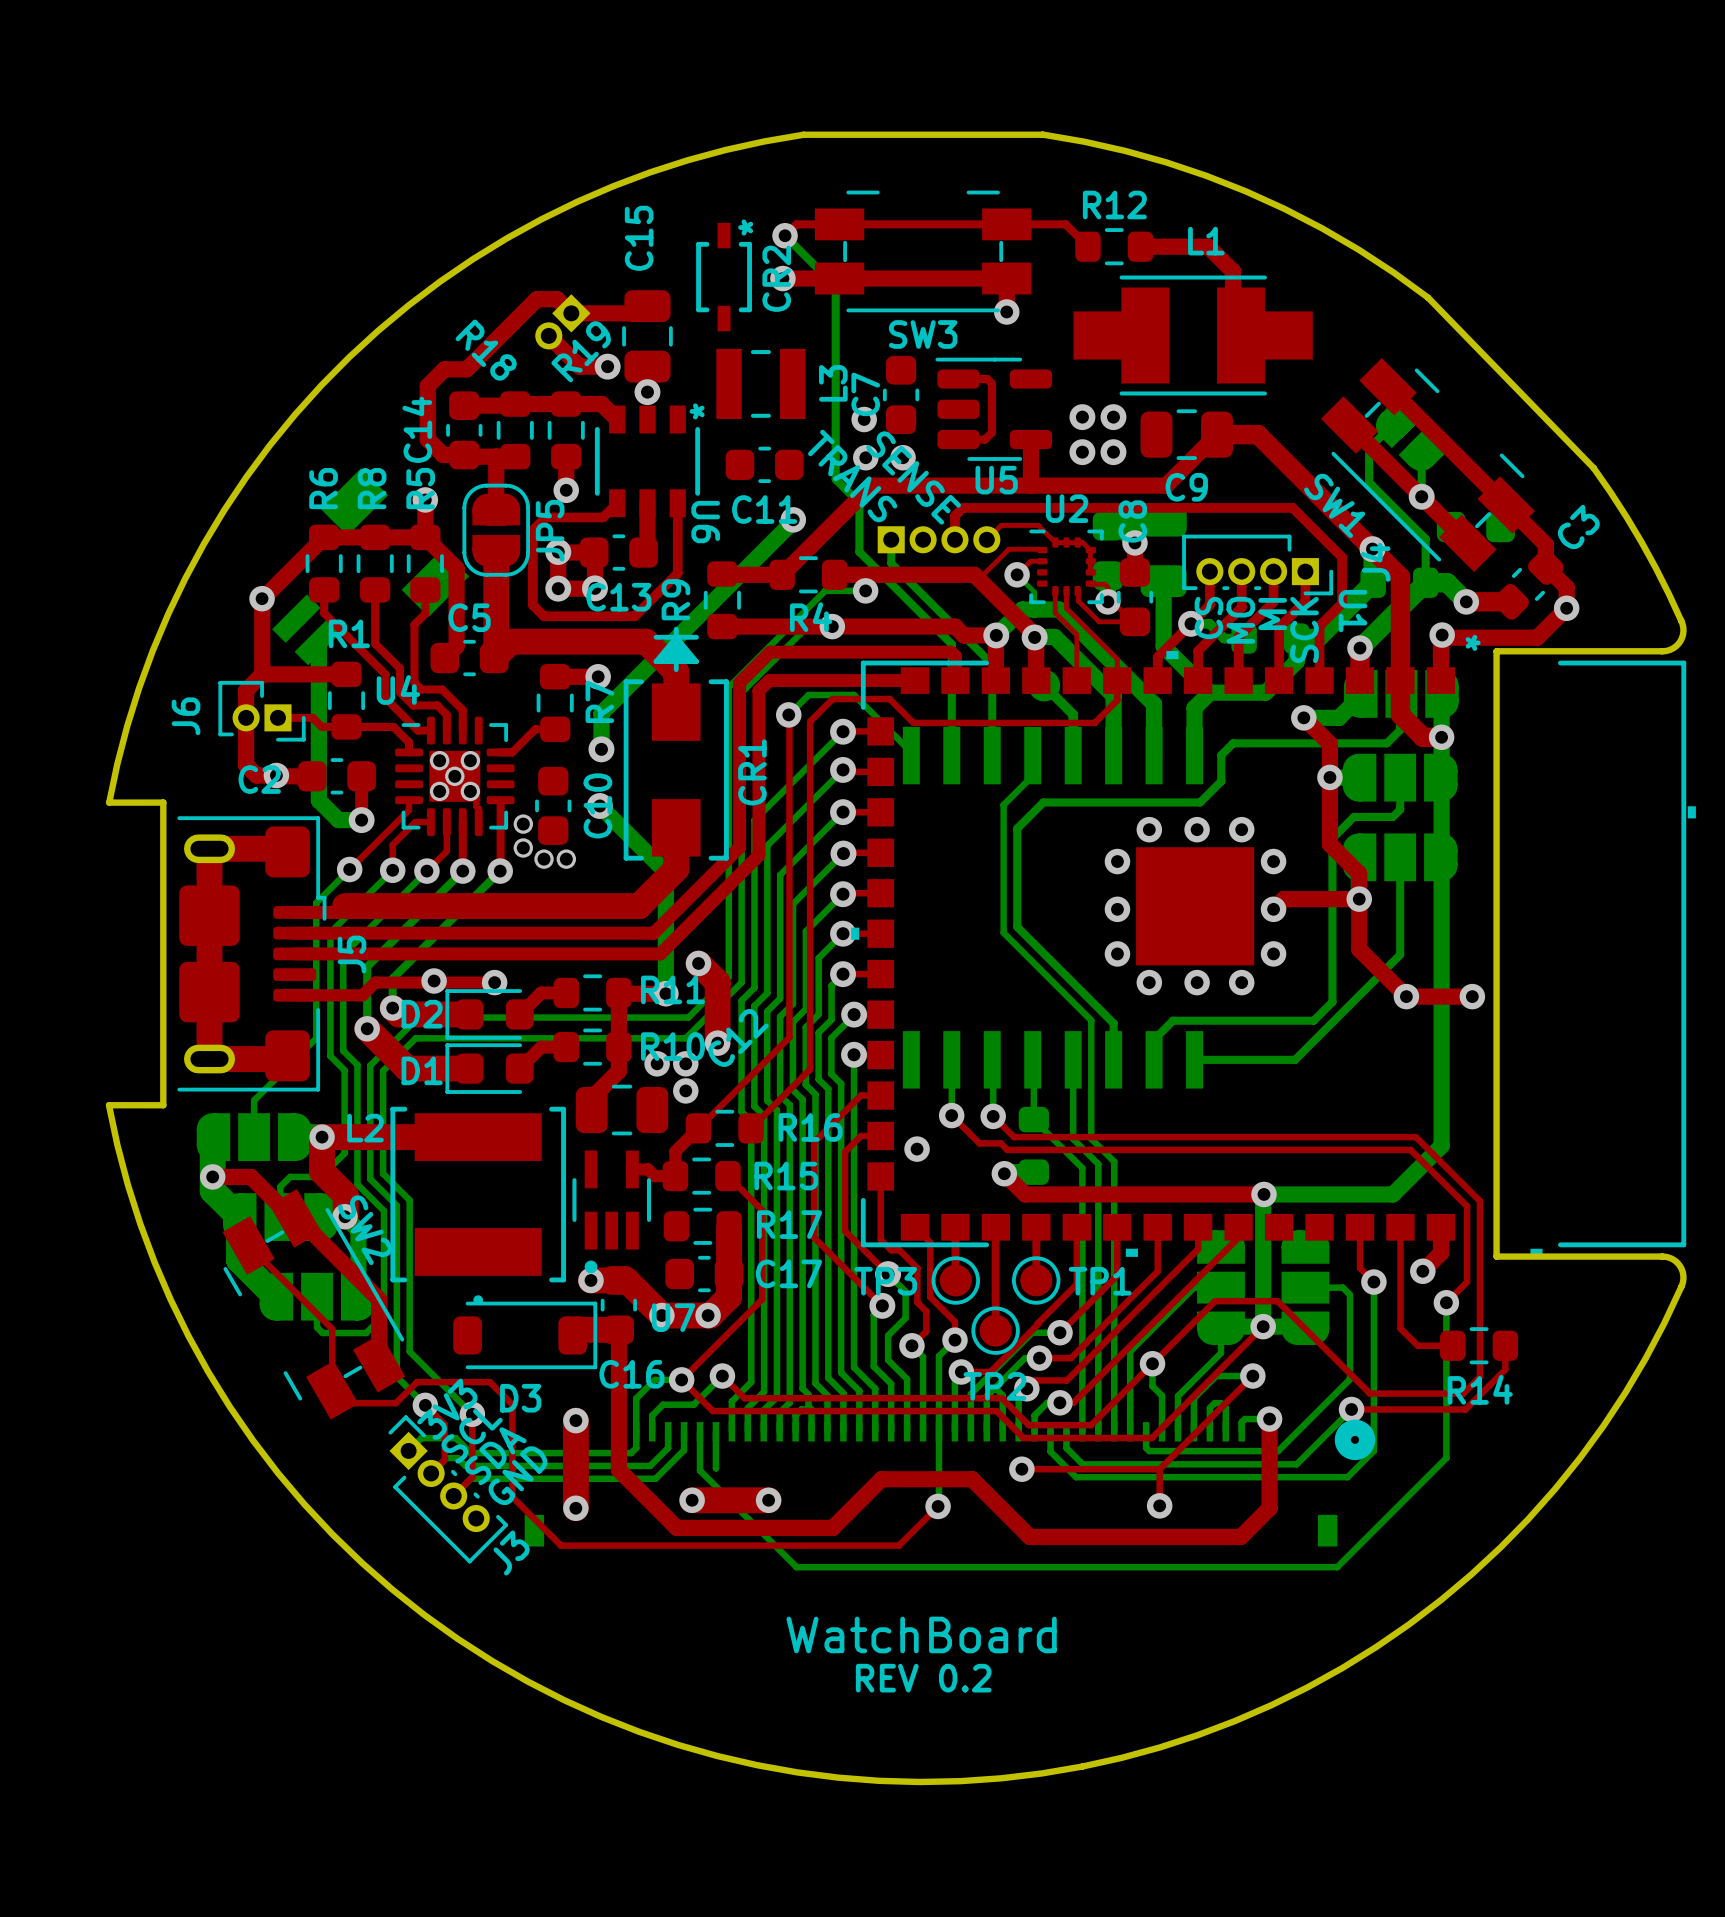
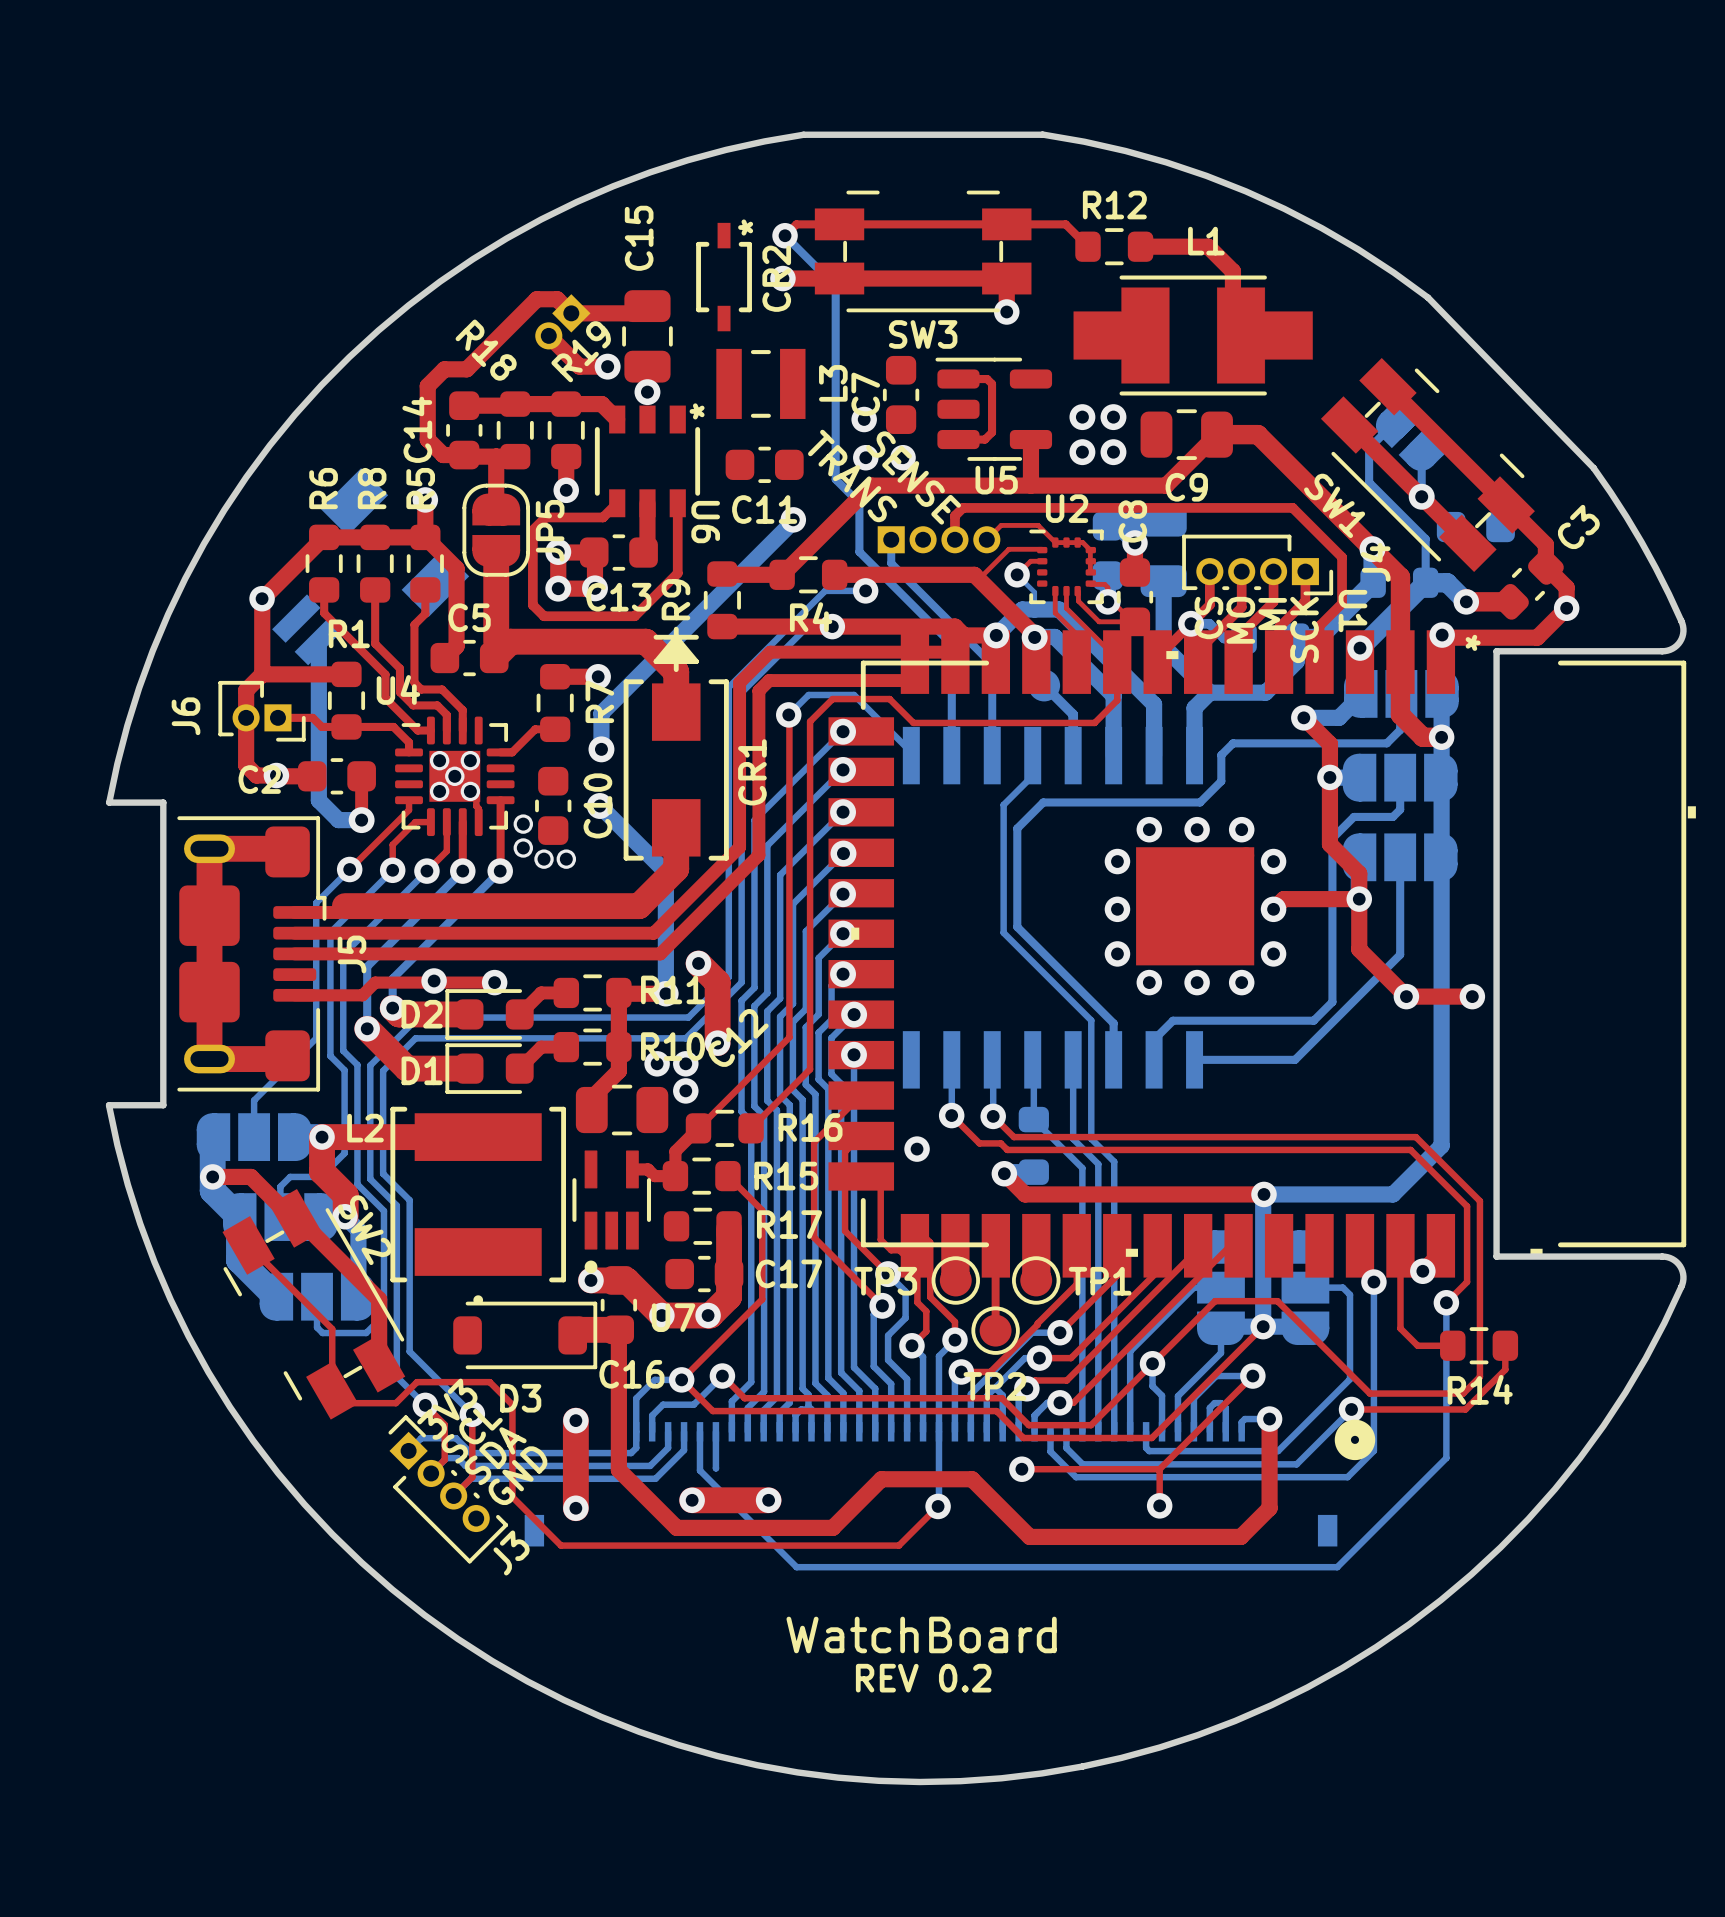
U1 footprint: [851, 651, 1696, 1257] -> [828, 630, 1696, 1278]

